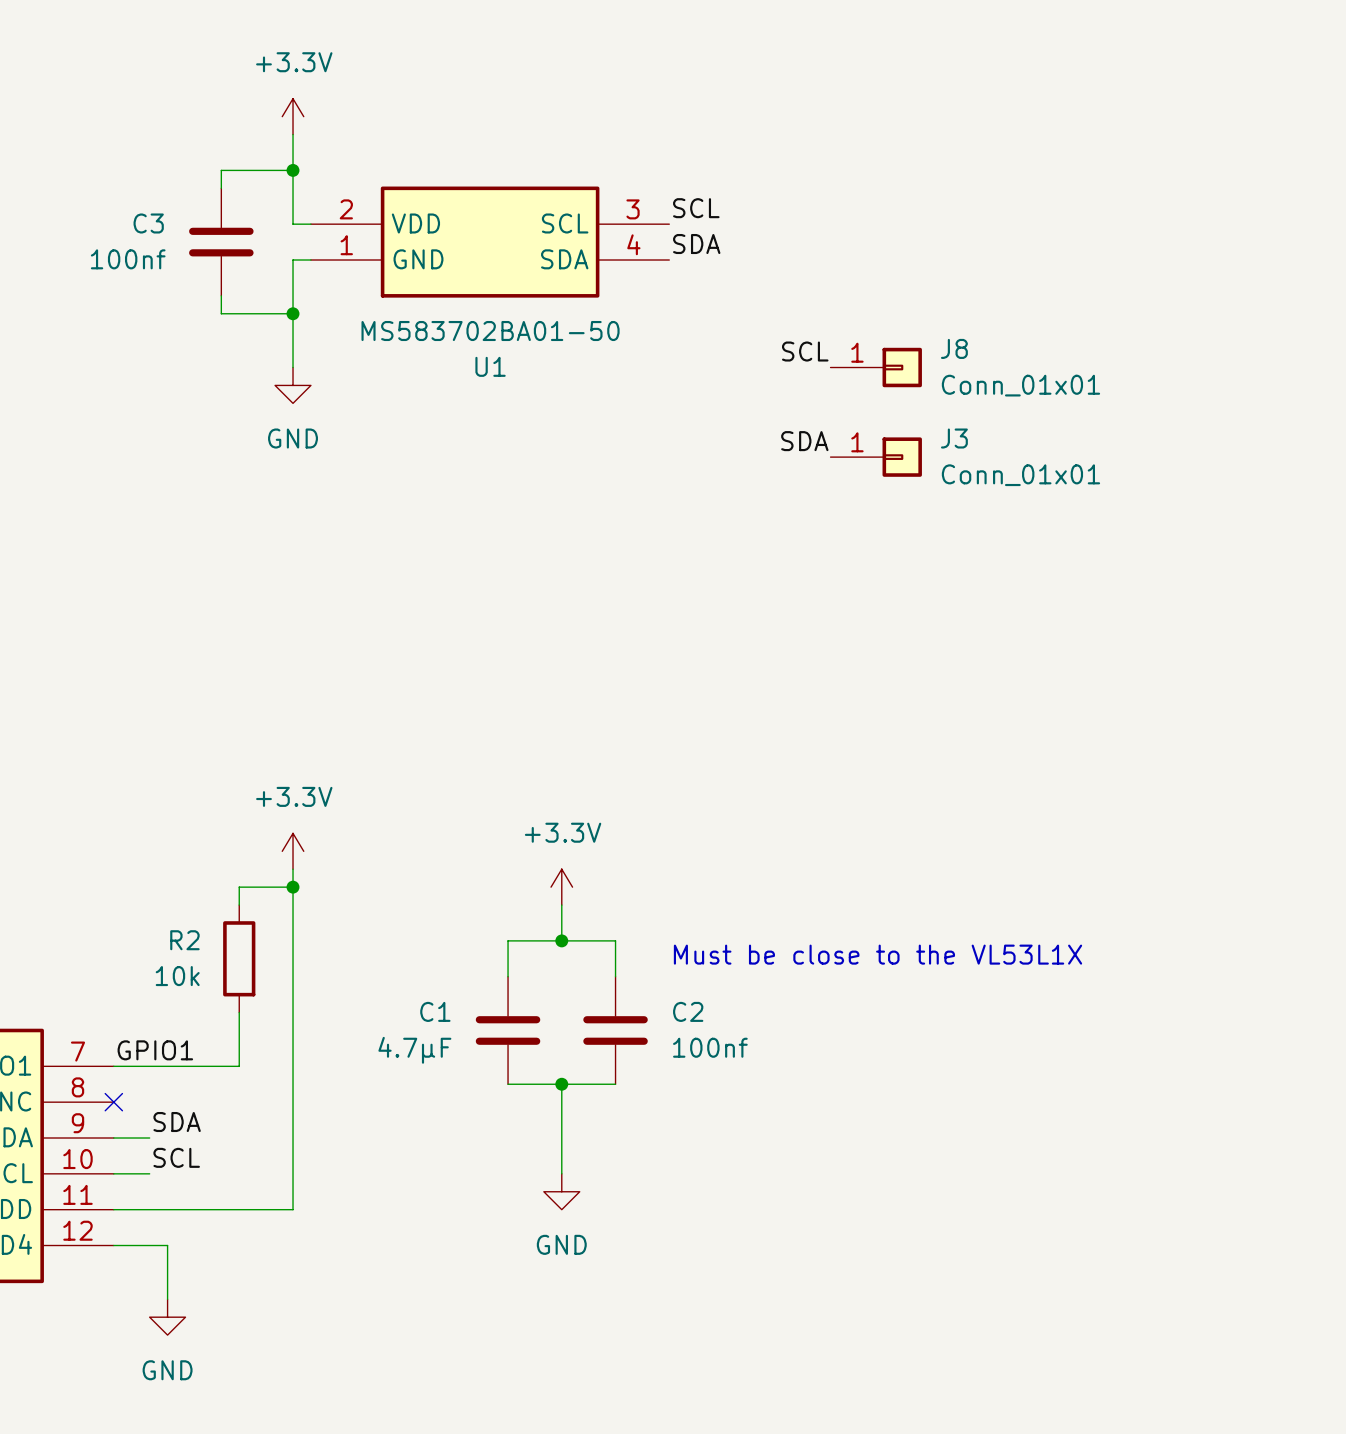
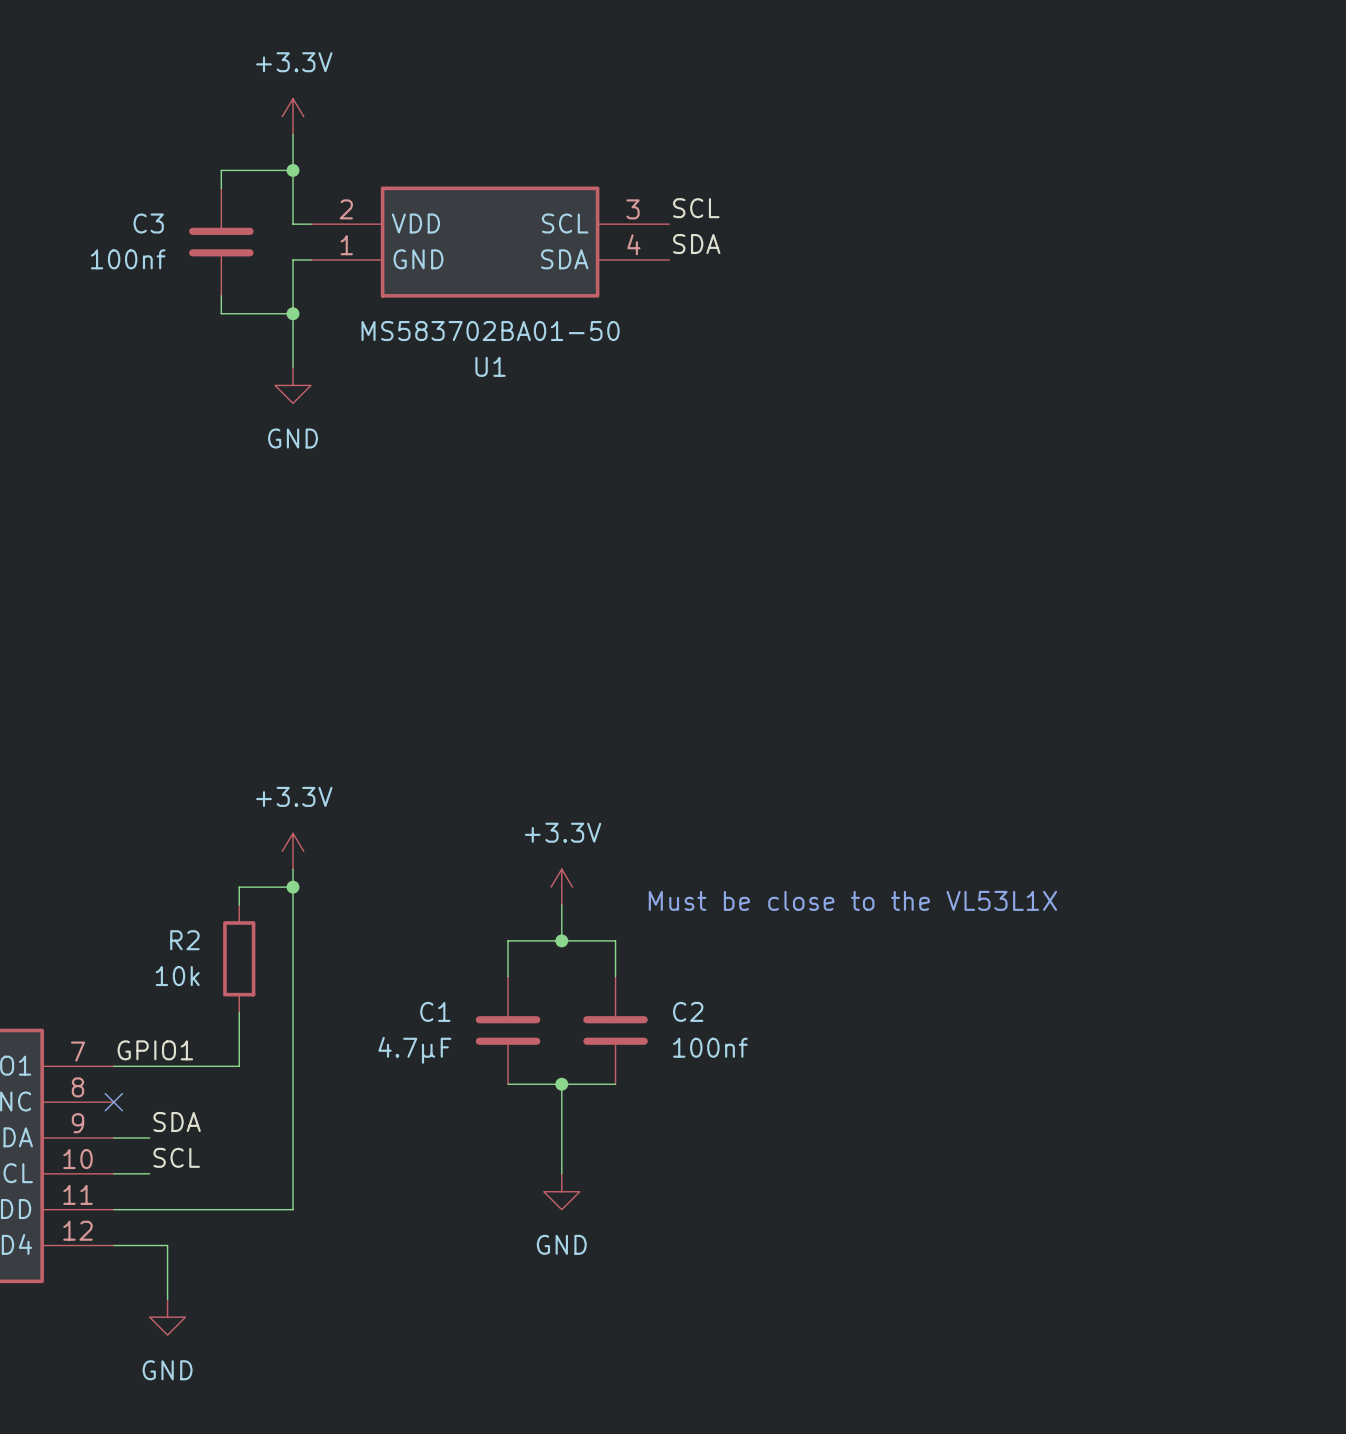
label: SCL (805, 351) -> none
J8: Conn_01x01 (876, 367) -> none
label: SDA (804, 441) -> none
J3: Conn_01x01 (876, 457) -> none
text position: Must be close to the VL53L1X (878, 954) -> Must be close to the VL53L1X (852, 900)

